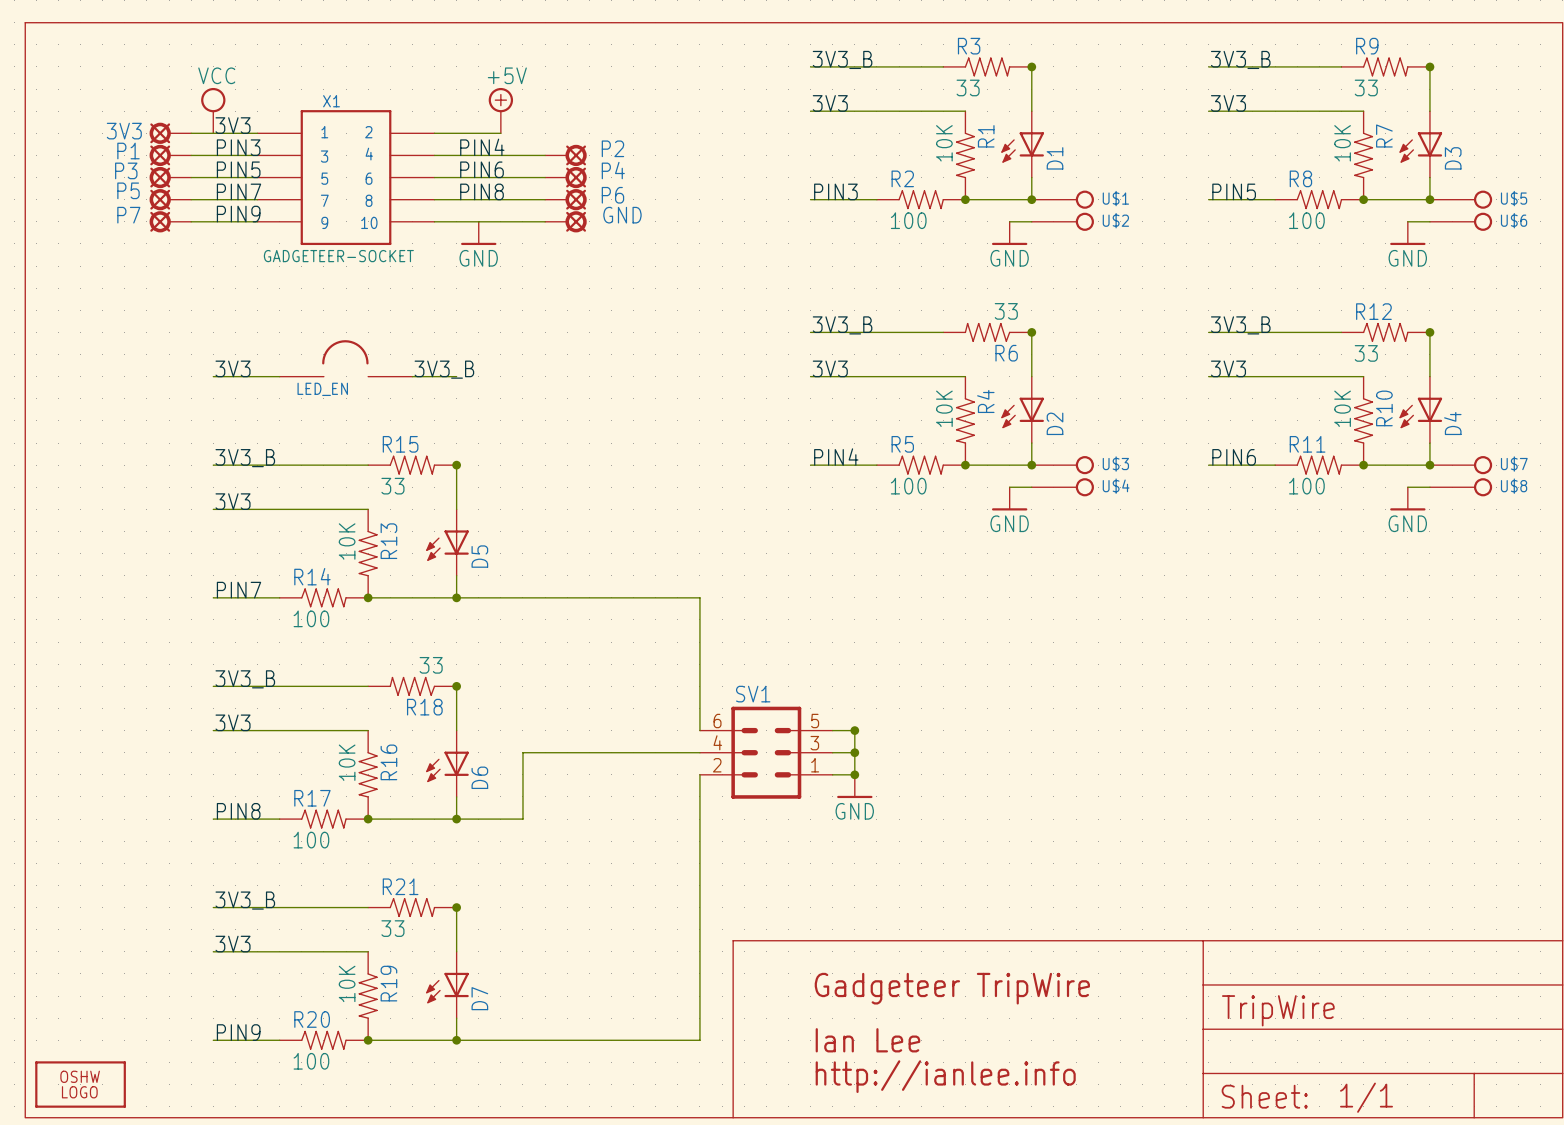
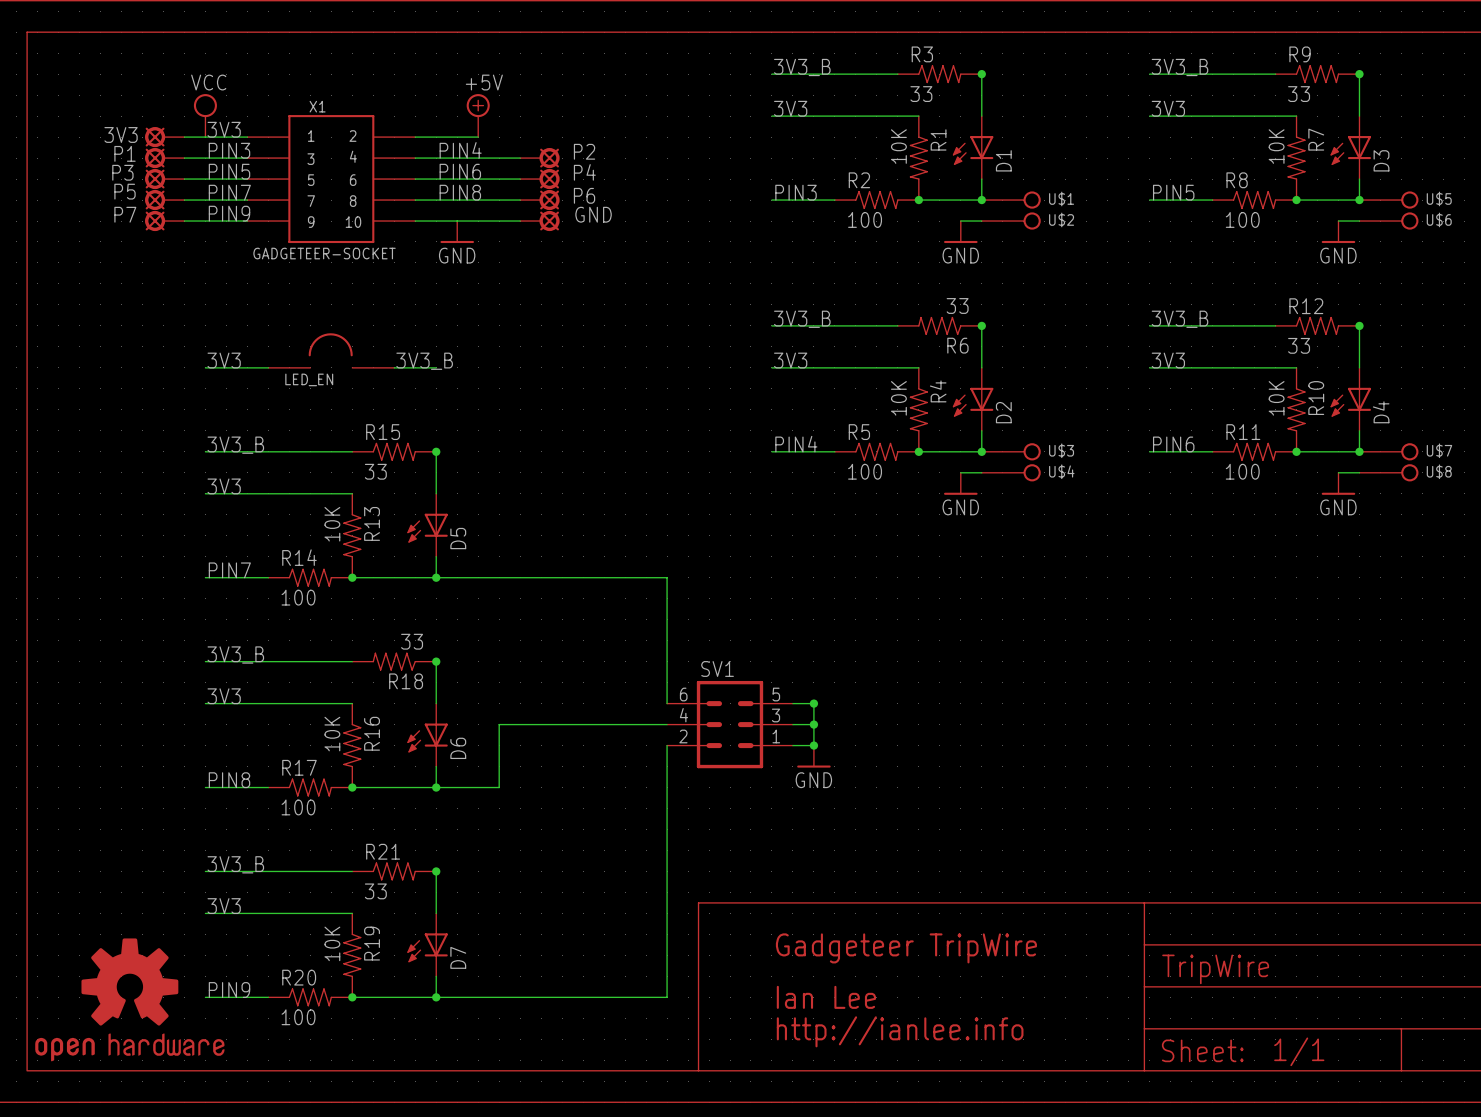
part: none -> (129, 999)
part: (80, 1084) -> none

